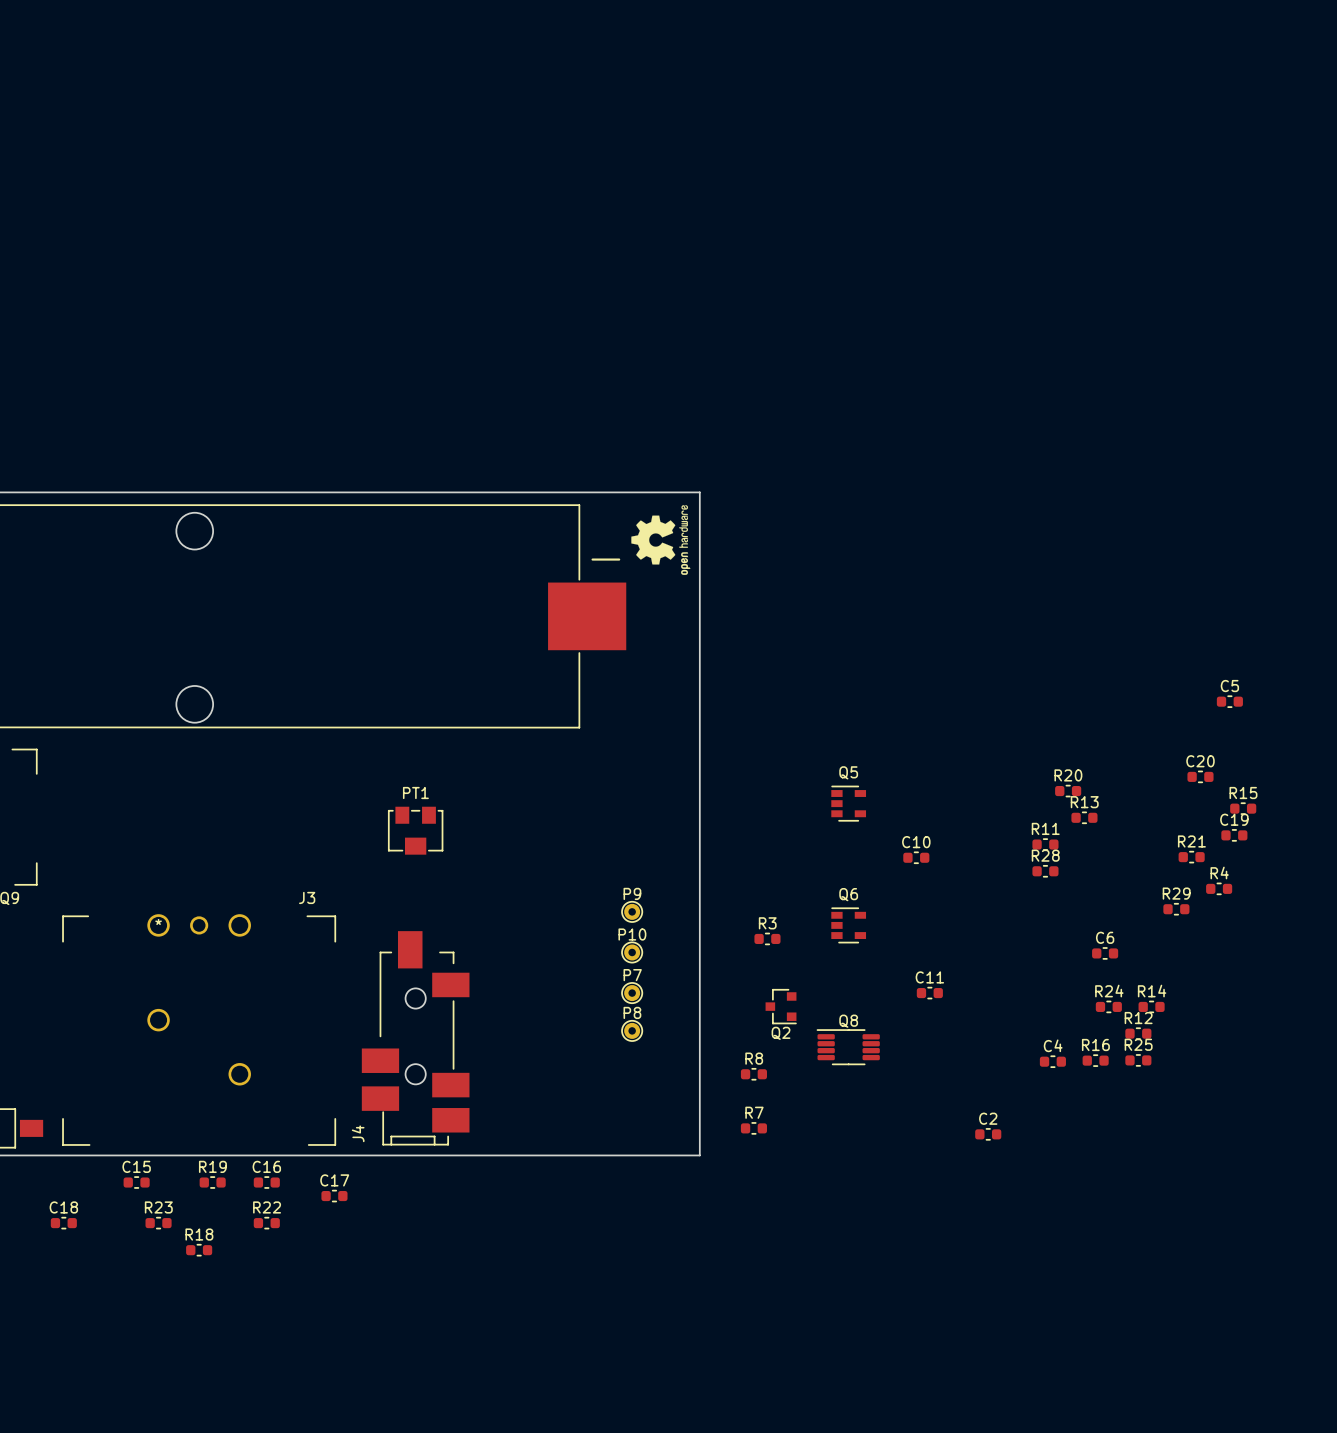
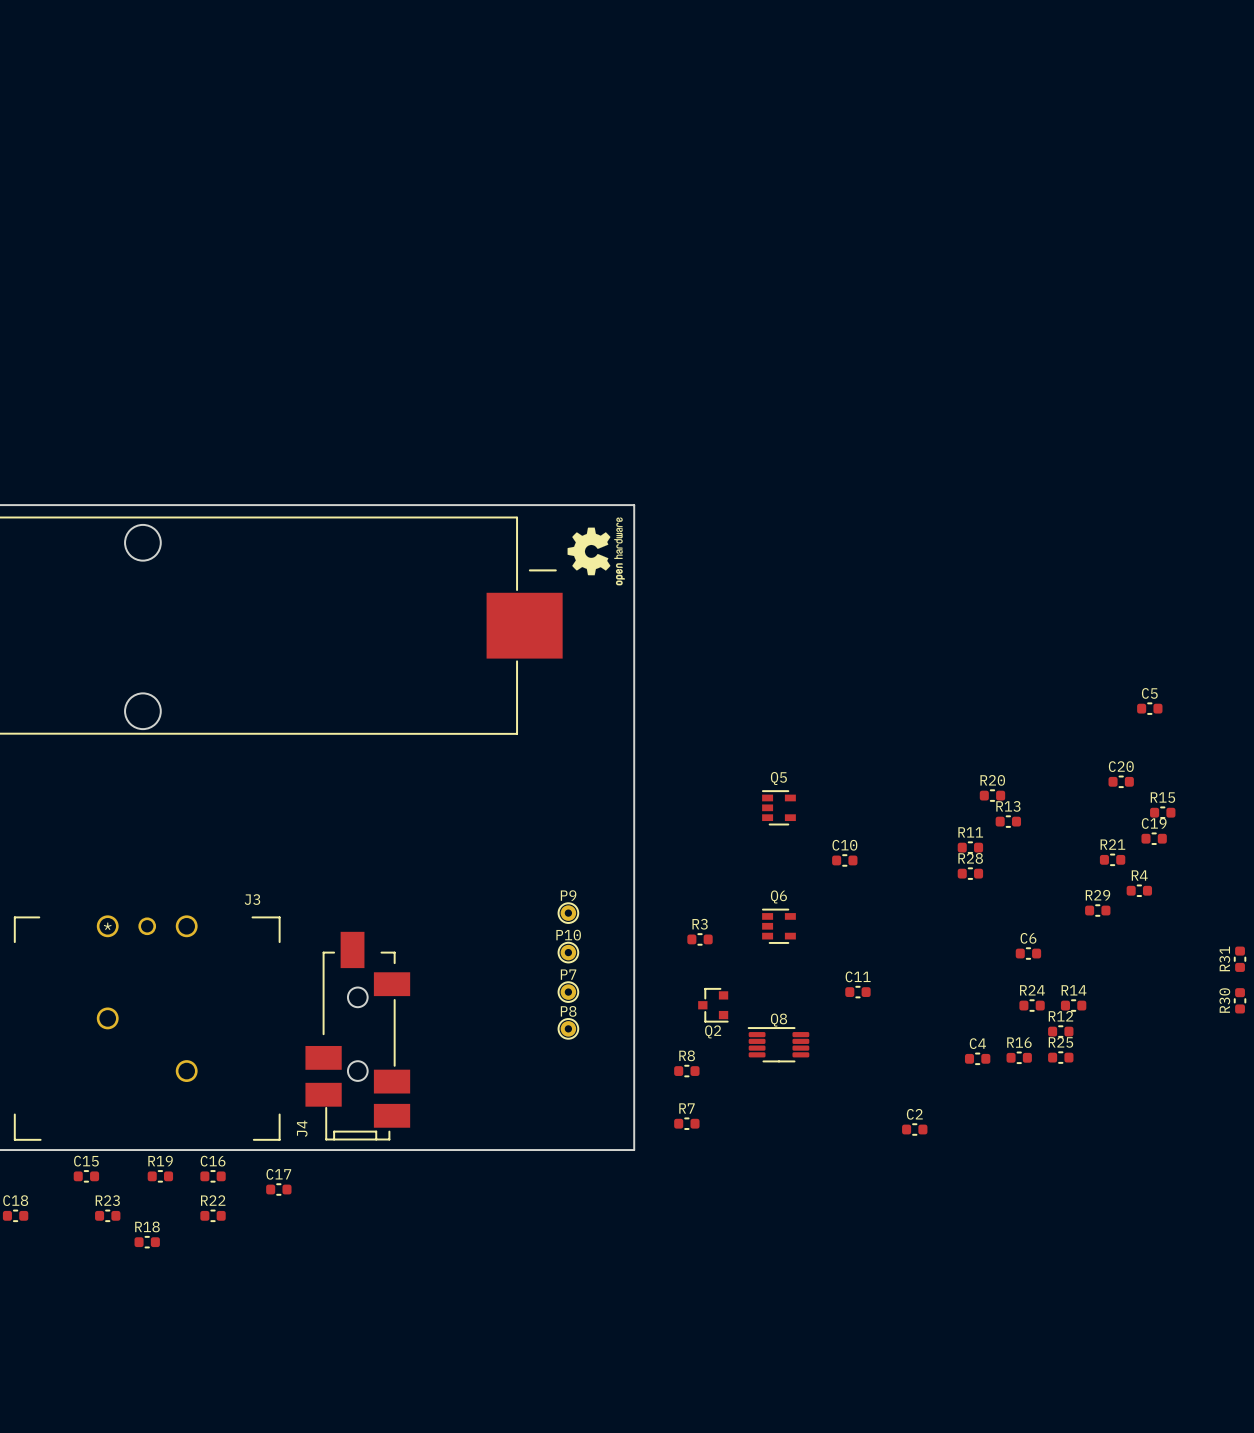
PT1: (415, 830) -> none
R31: none -> (1240, 959)
R30: none -> (1240, 1000)

